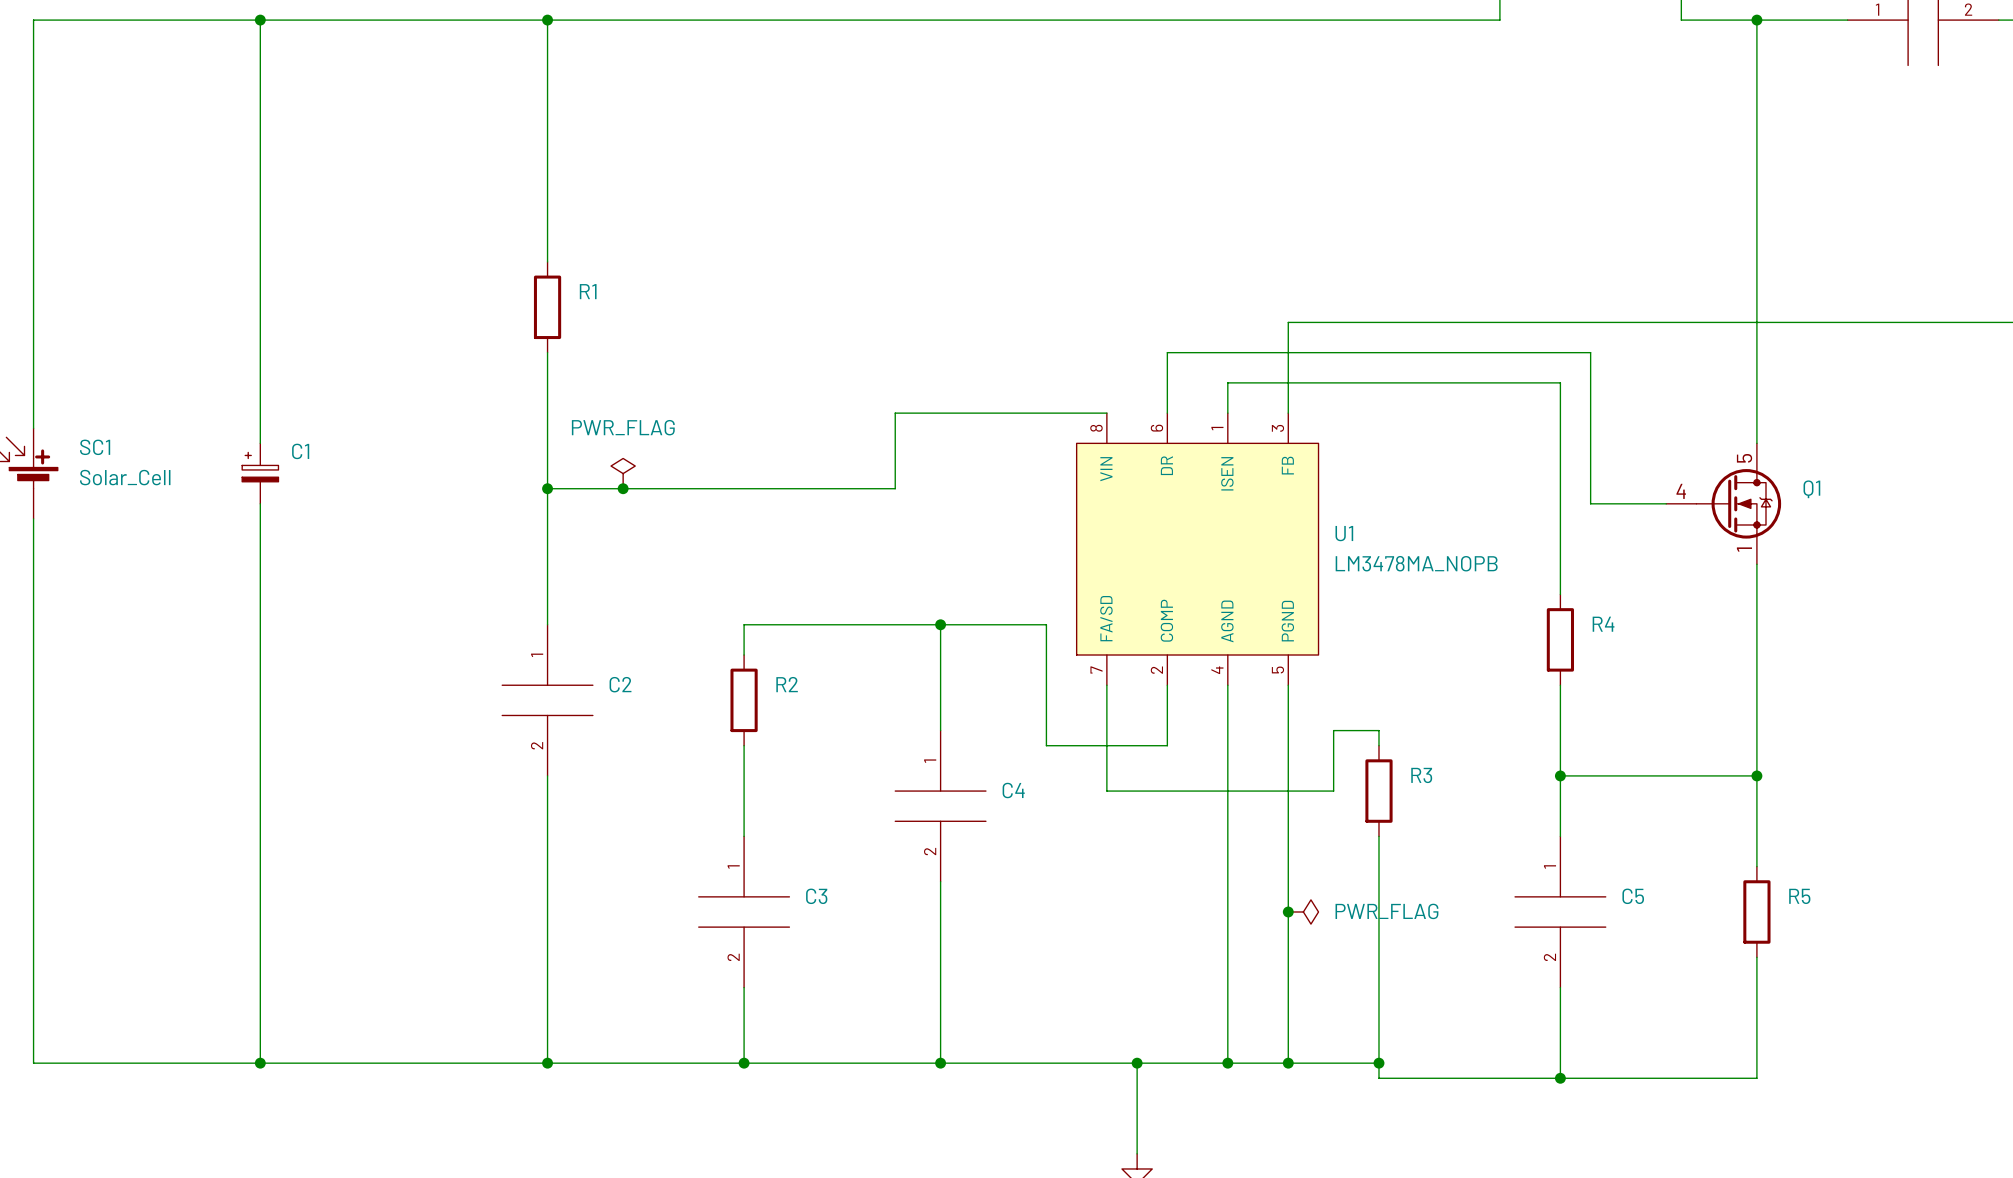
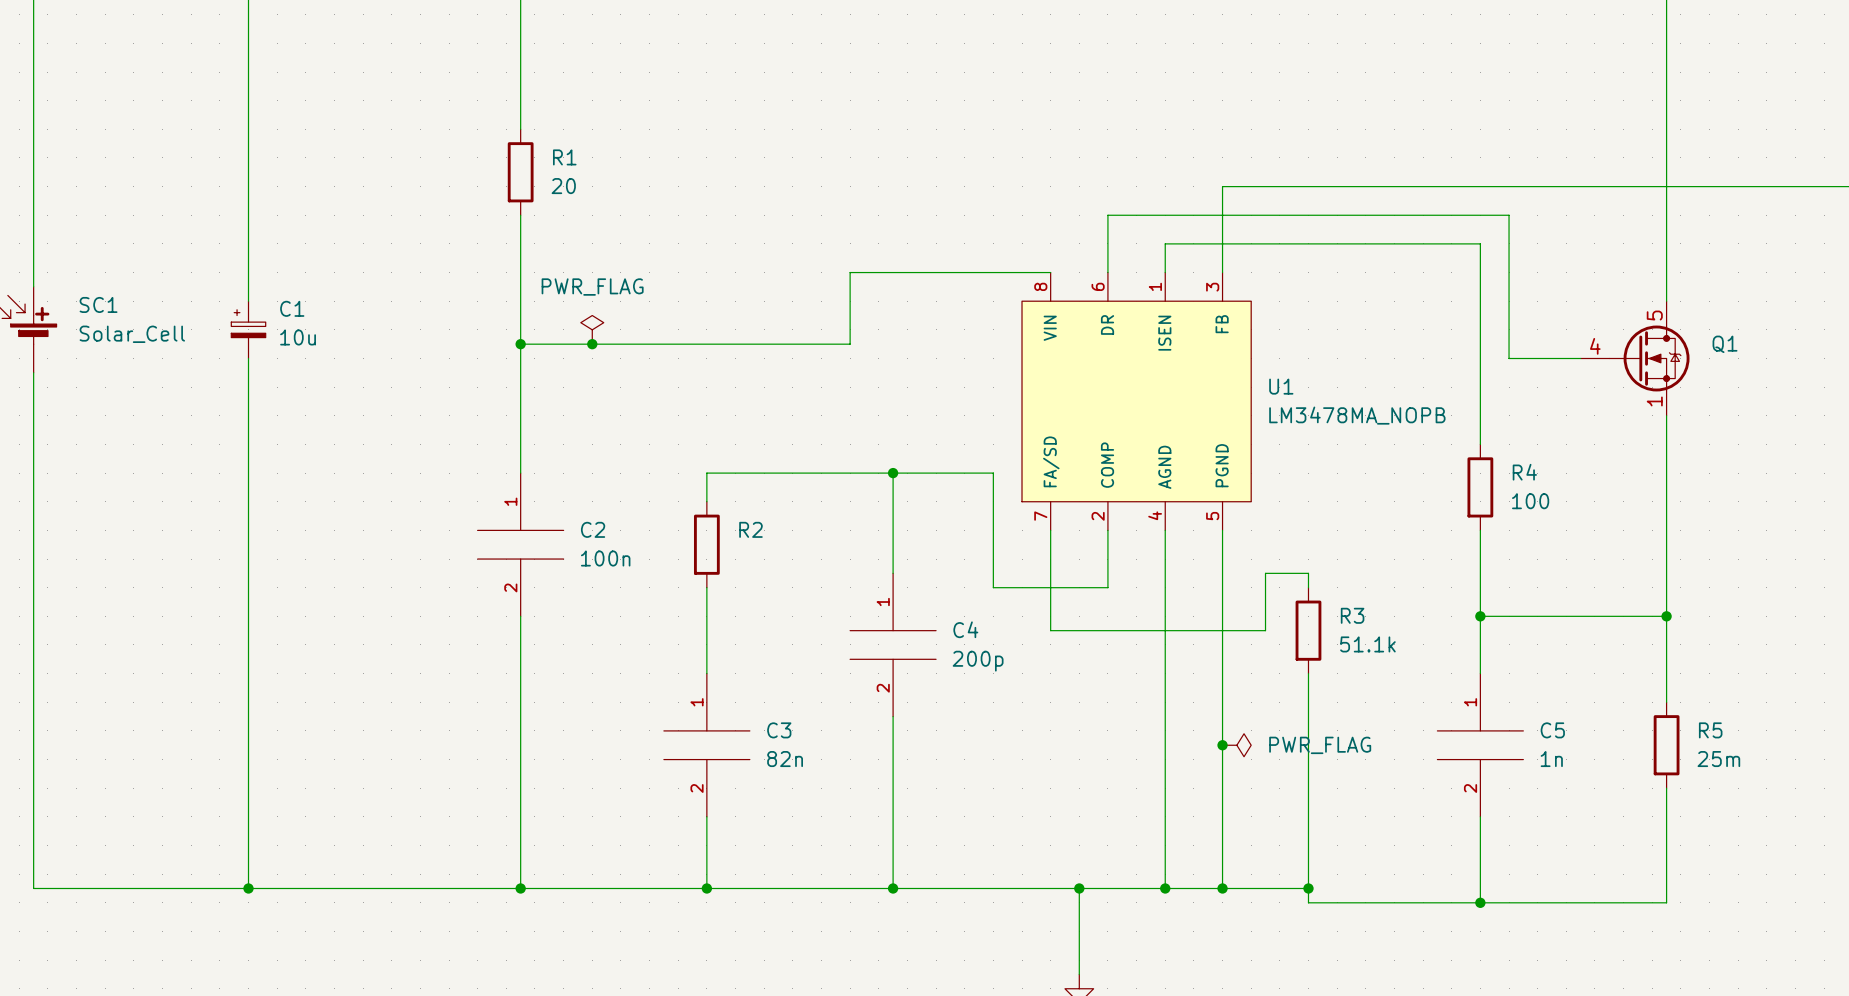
R1 value: none -> 20 (563, 186)
C1 value: none -> 10u (298, 337)
R4 value: none -> 100 (1530, 501)
C2 value: none -> 100n (605, 558)
R3 value: none -> 51.1k (1367, 644)
C4 value: none -> 200p (978, 661)
C3 value: none -> 82n (785, 759)
C5 value: none -> 1n (1551, 759)
R5 value: none -> 25m (1718, 759)

